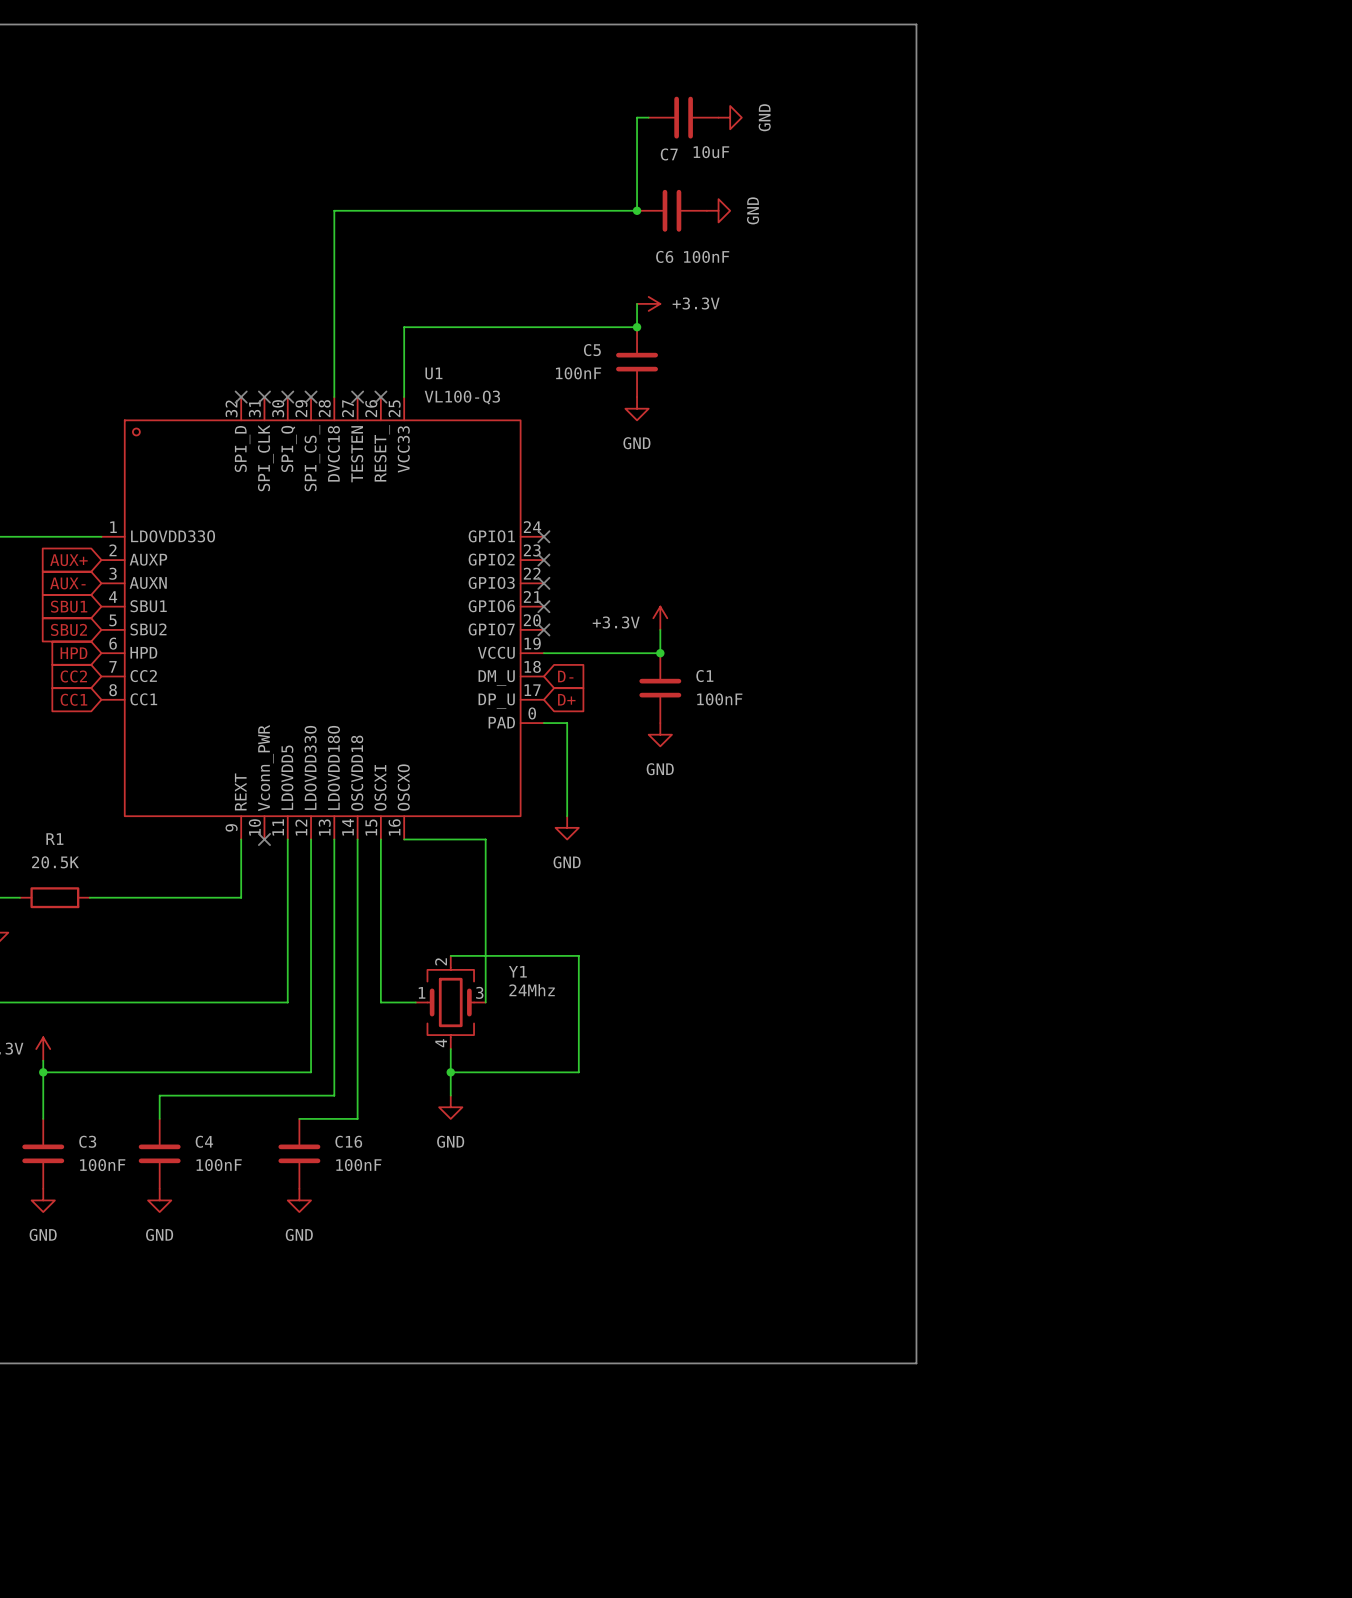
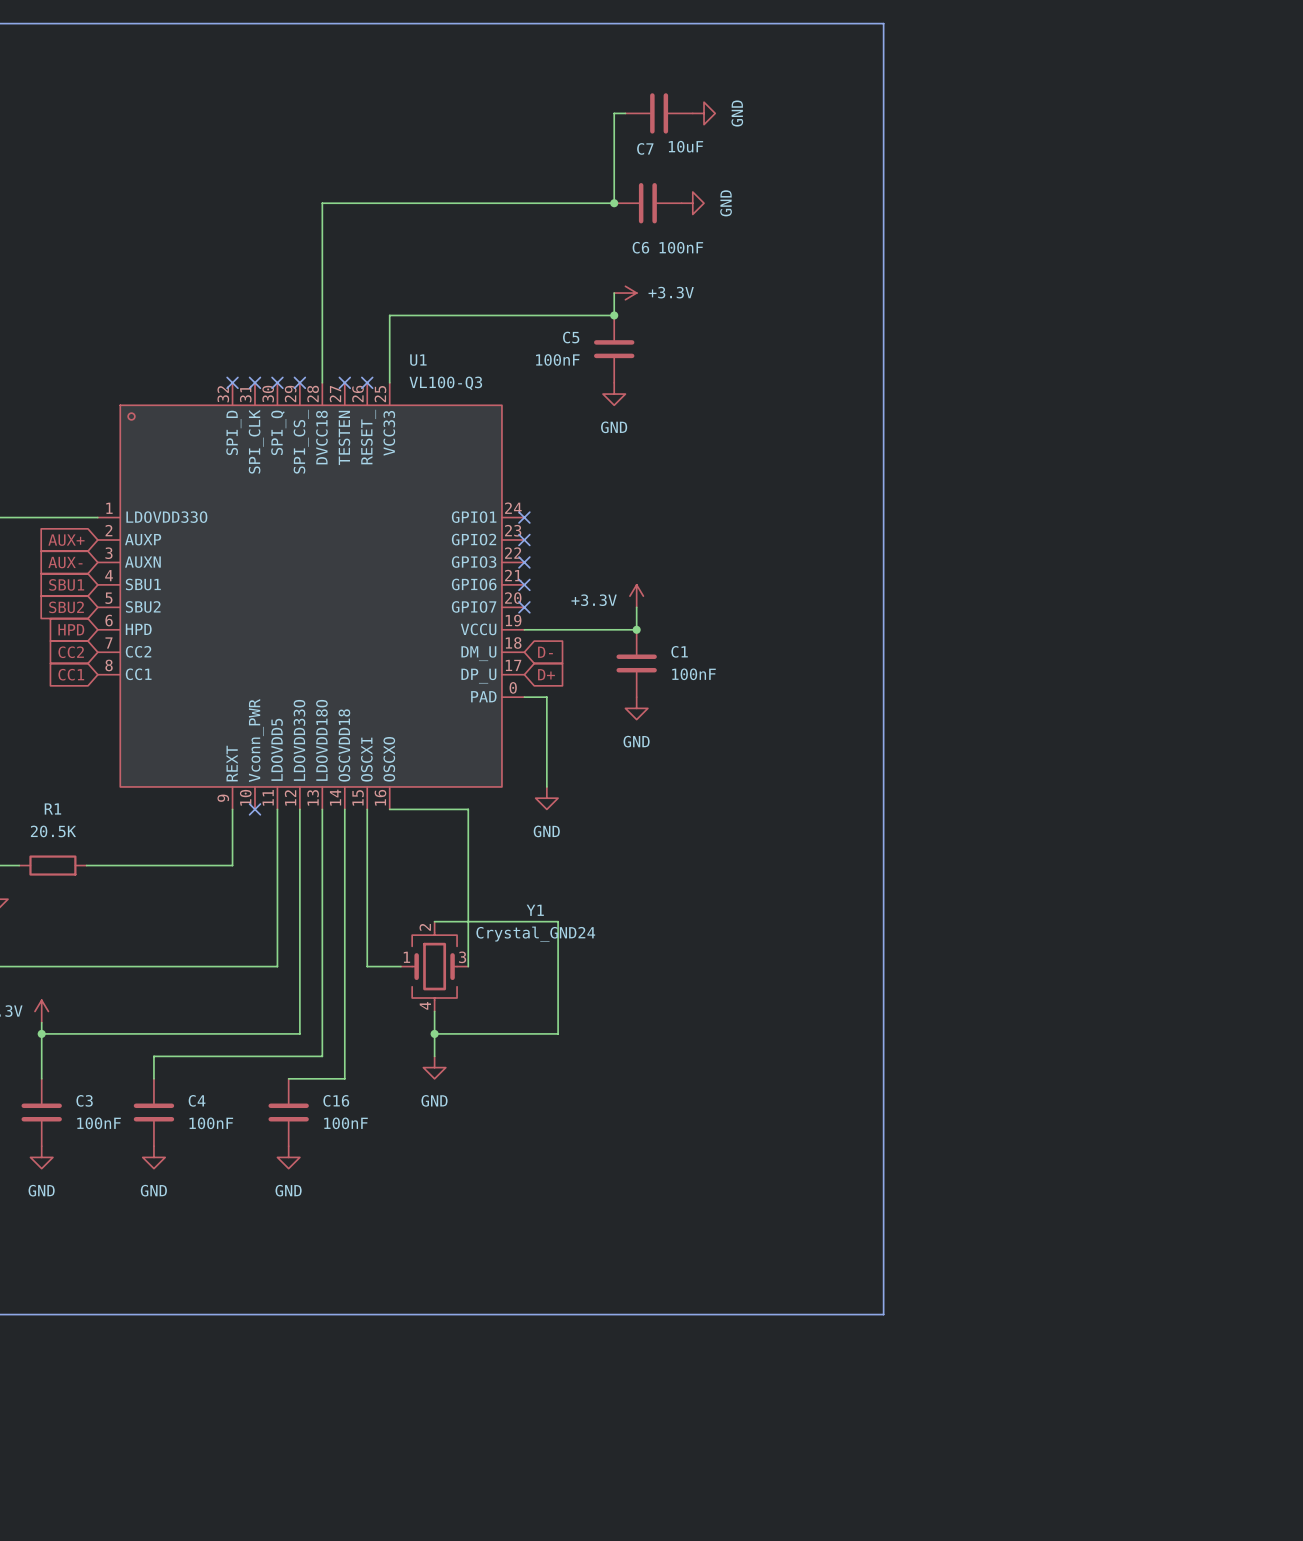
Y1 name position: Y1 (517, 971) -> Y1 (535, 910)
Y1 value: 24Mhz (532, 990) -> Crystal_GND24 (535, 934)

